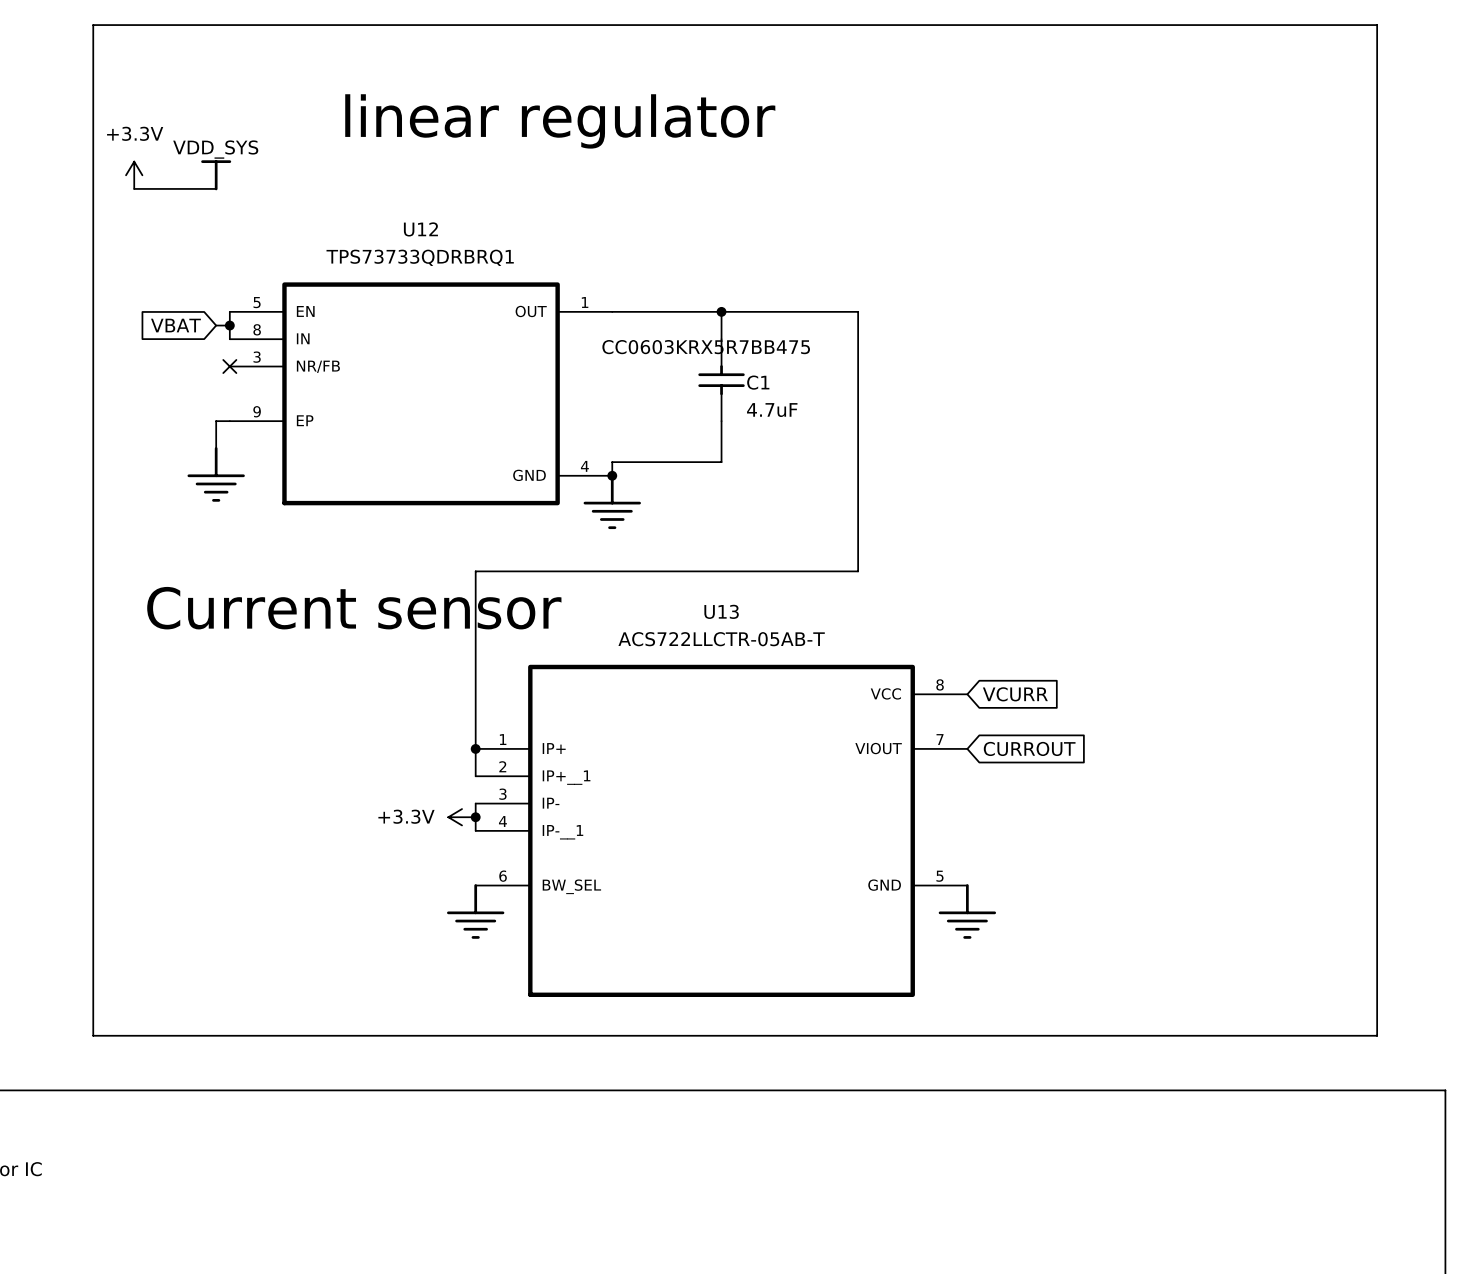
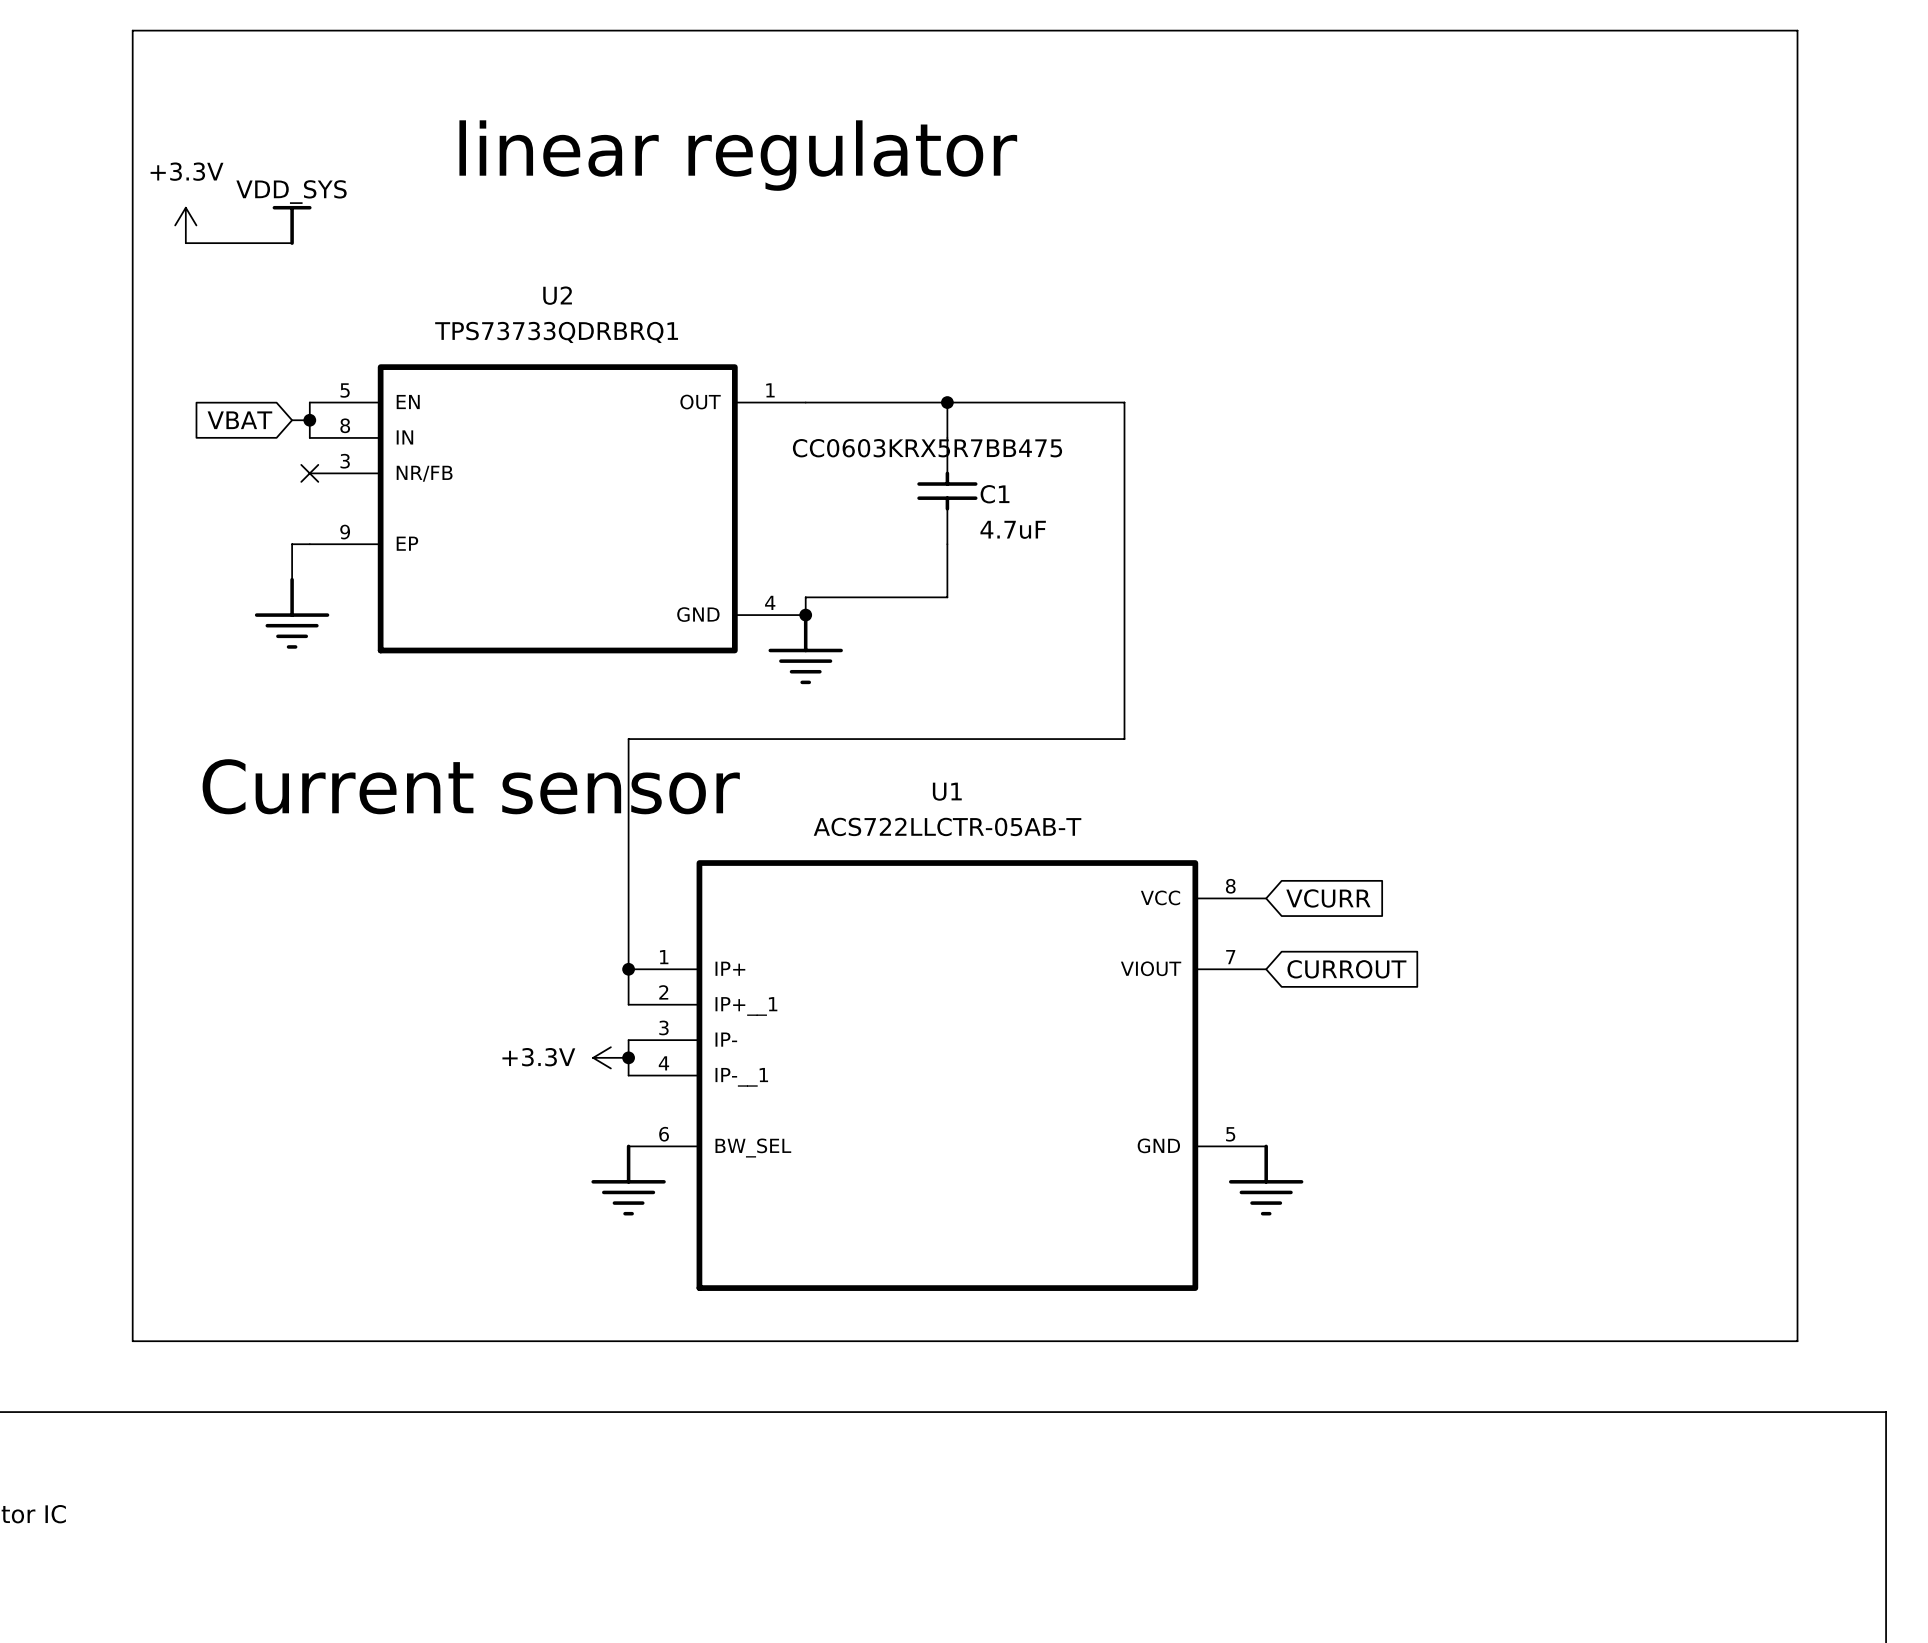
U12 name: U12 (420, 229) -> U2 (557, 295)
U13 name: U13 (721, 611) -> U1 (947, 791)

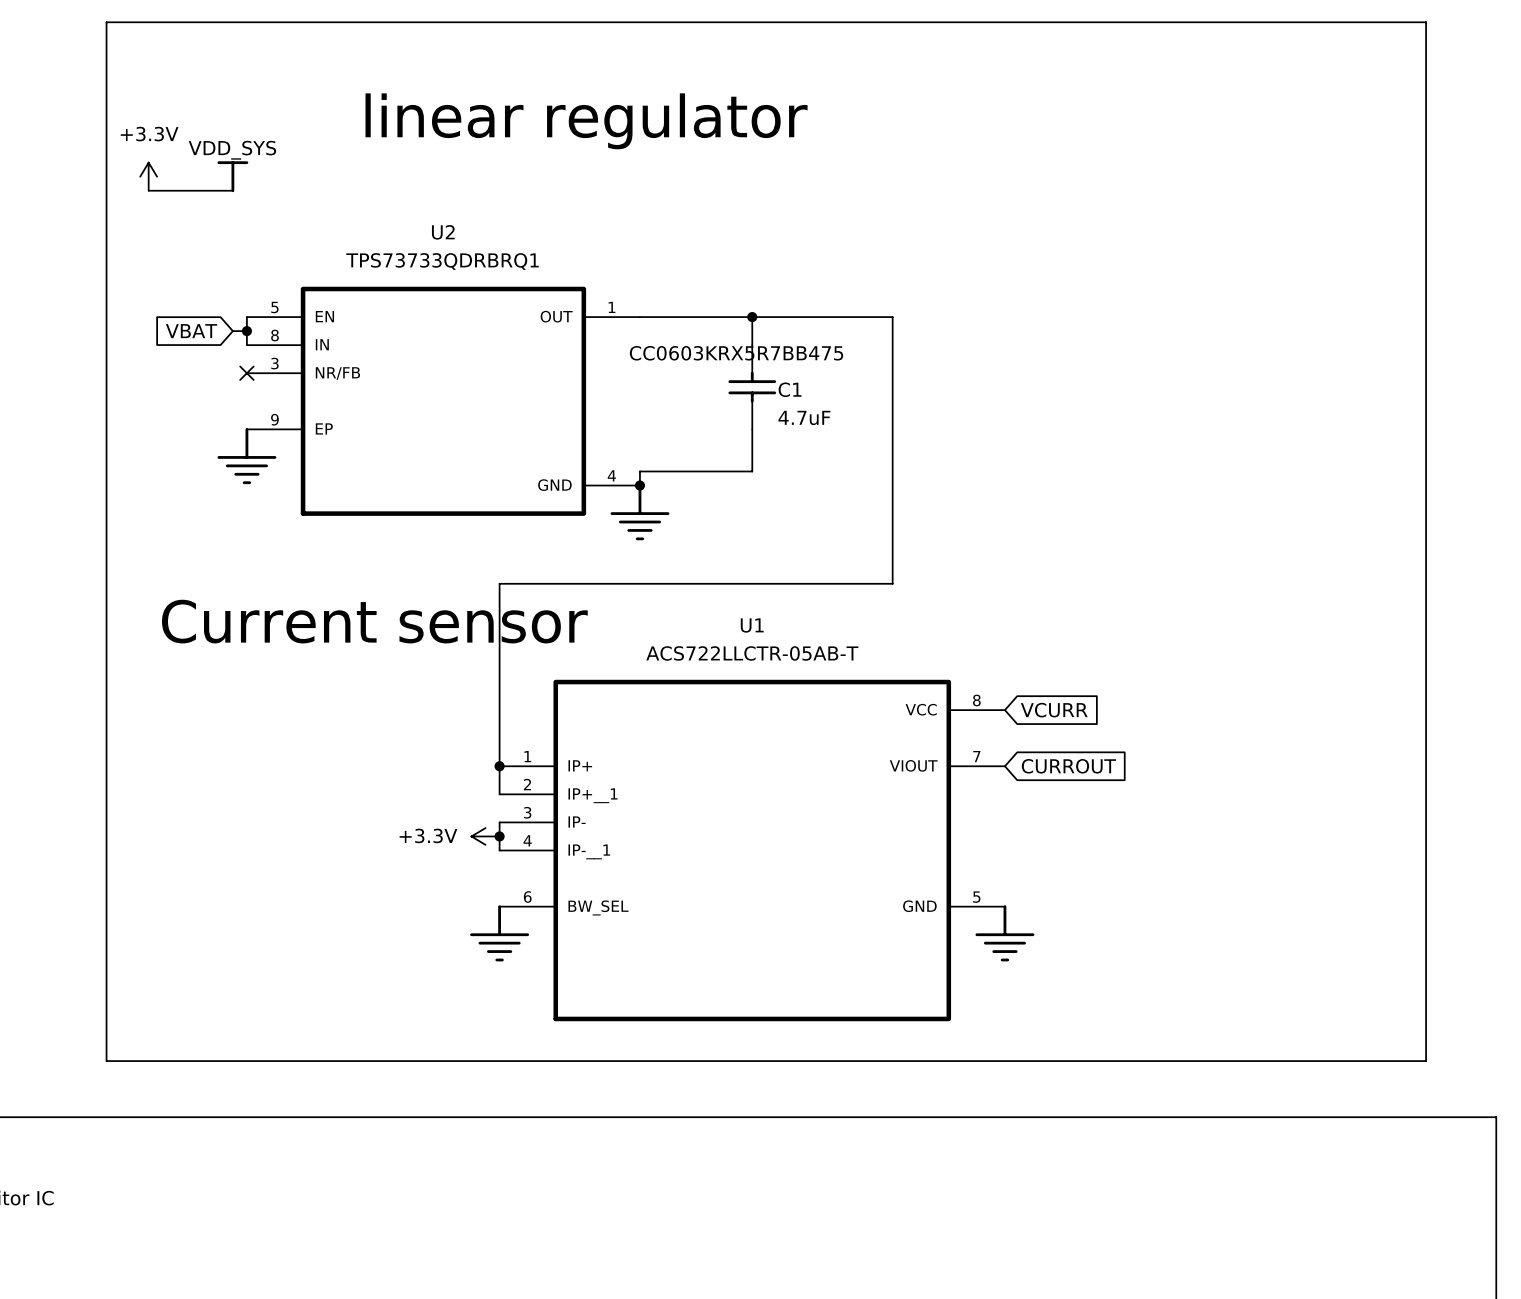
wire: (309, 544) (292, 544) (292, 579) -> none
power symbol position: (292, 613) -> (246, 456)

